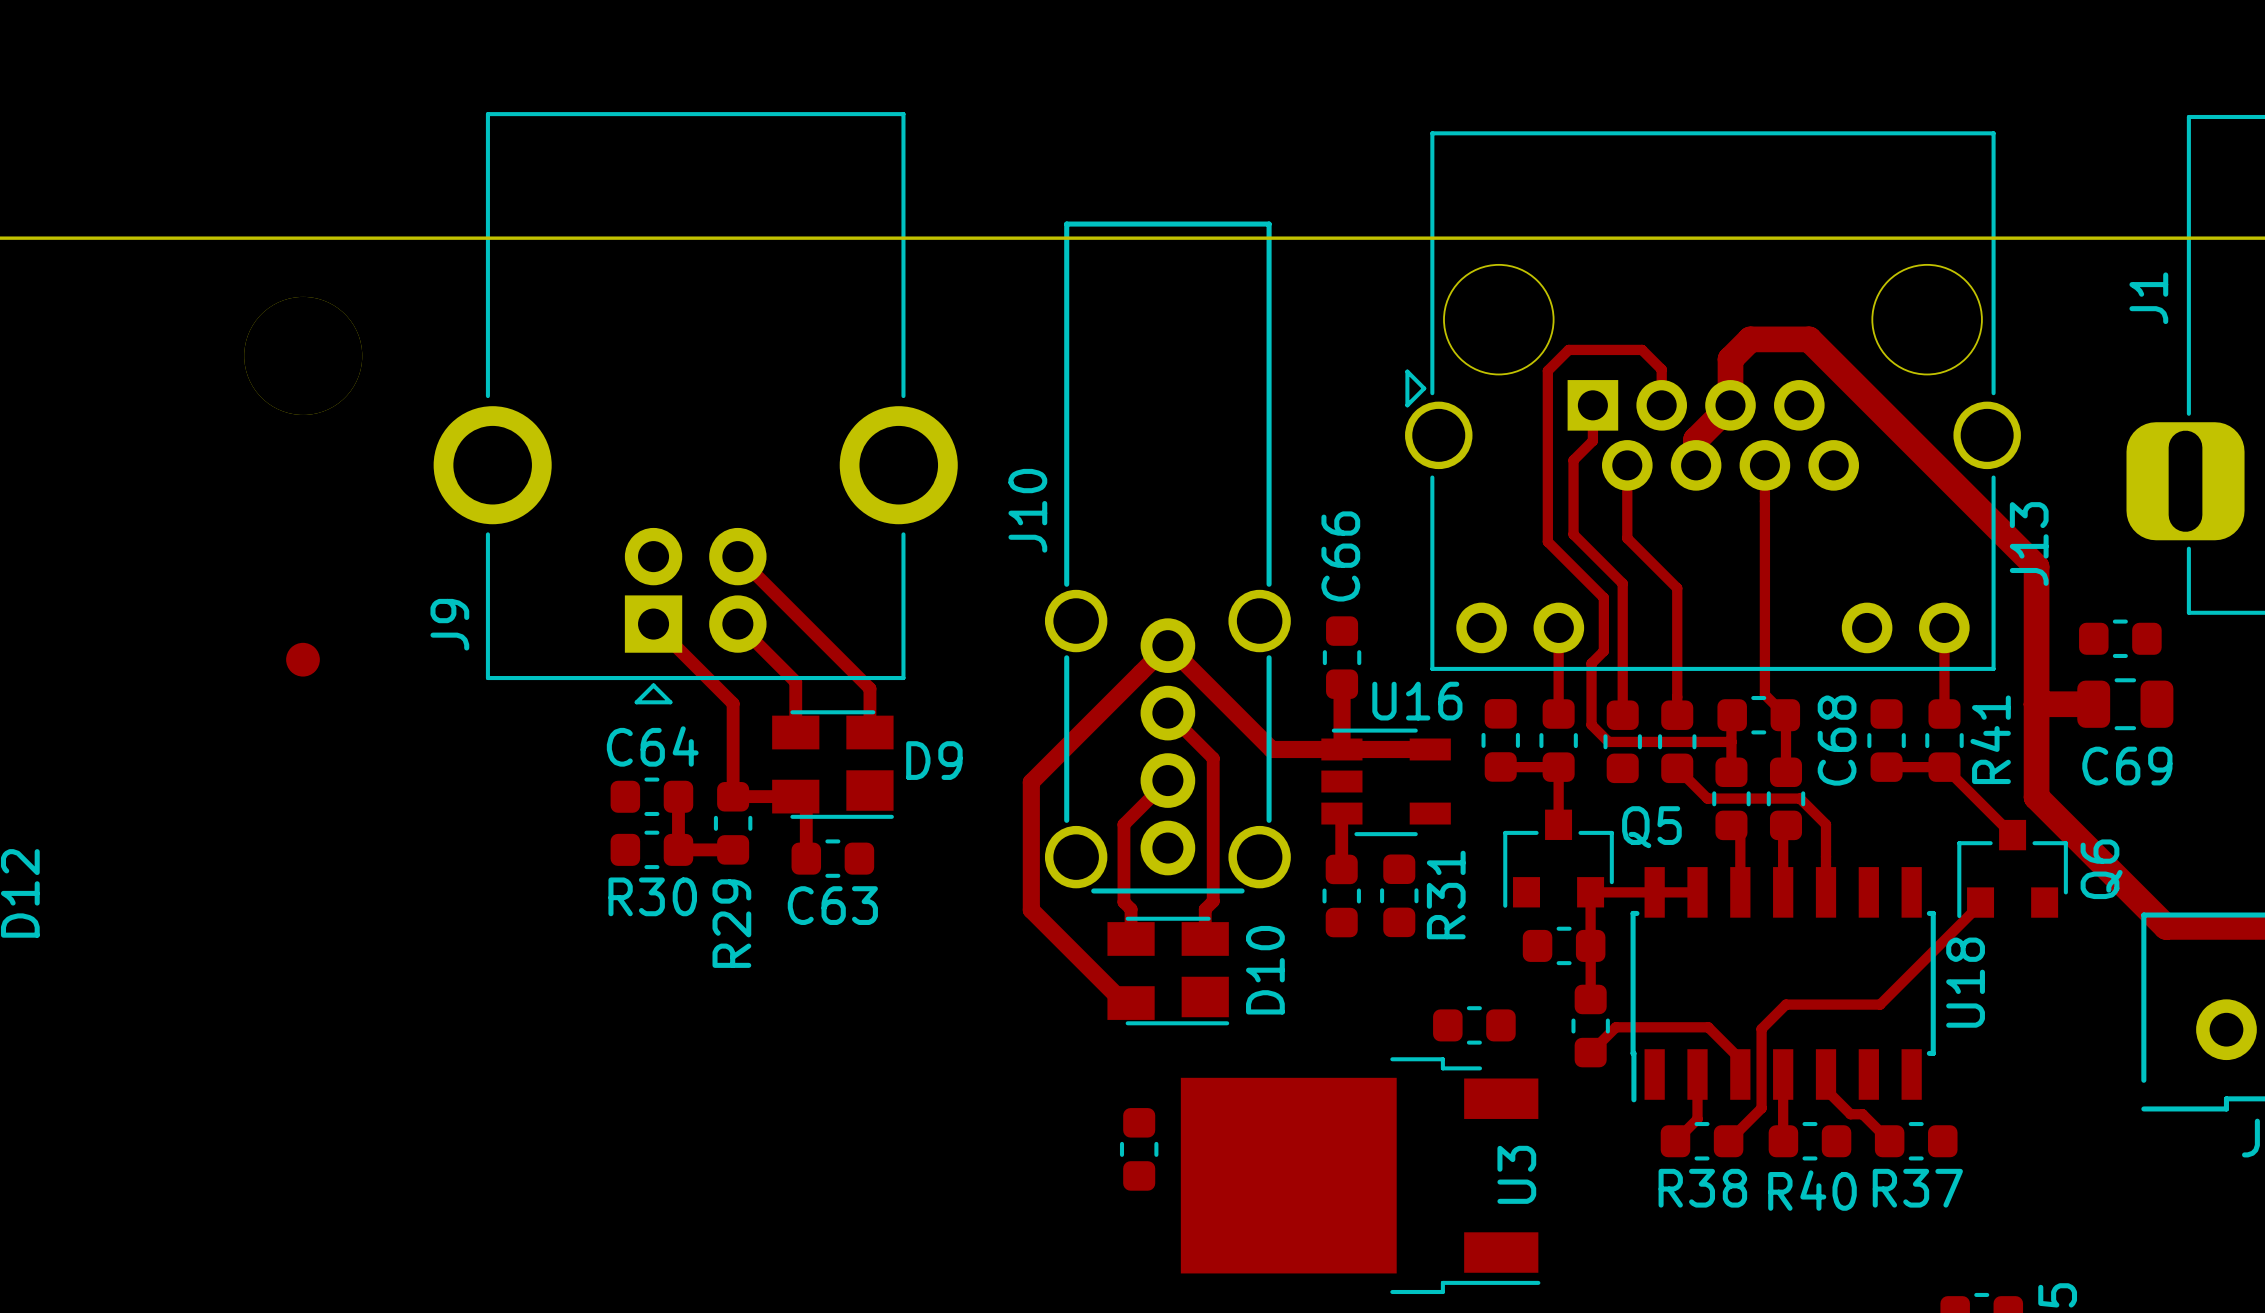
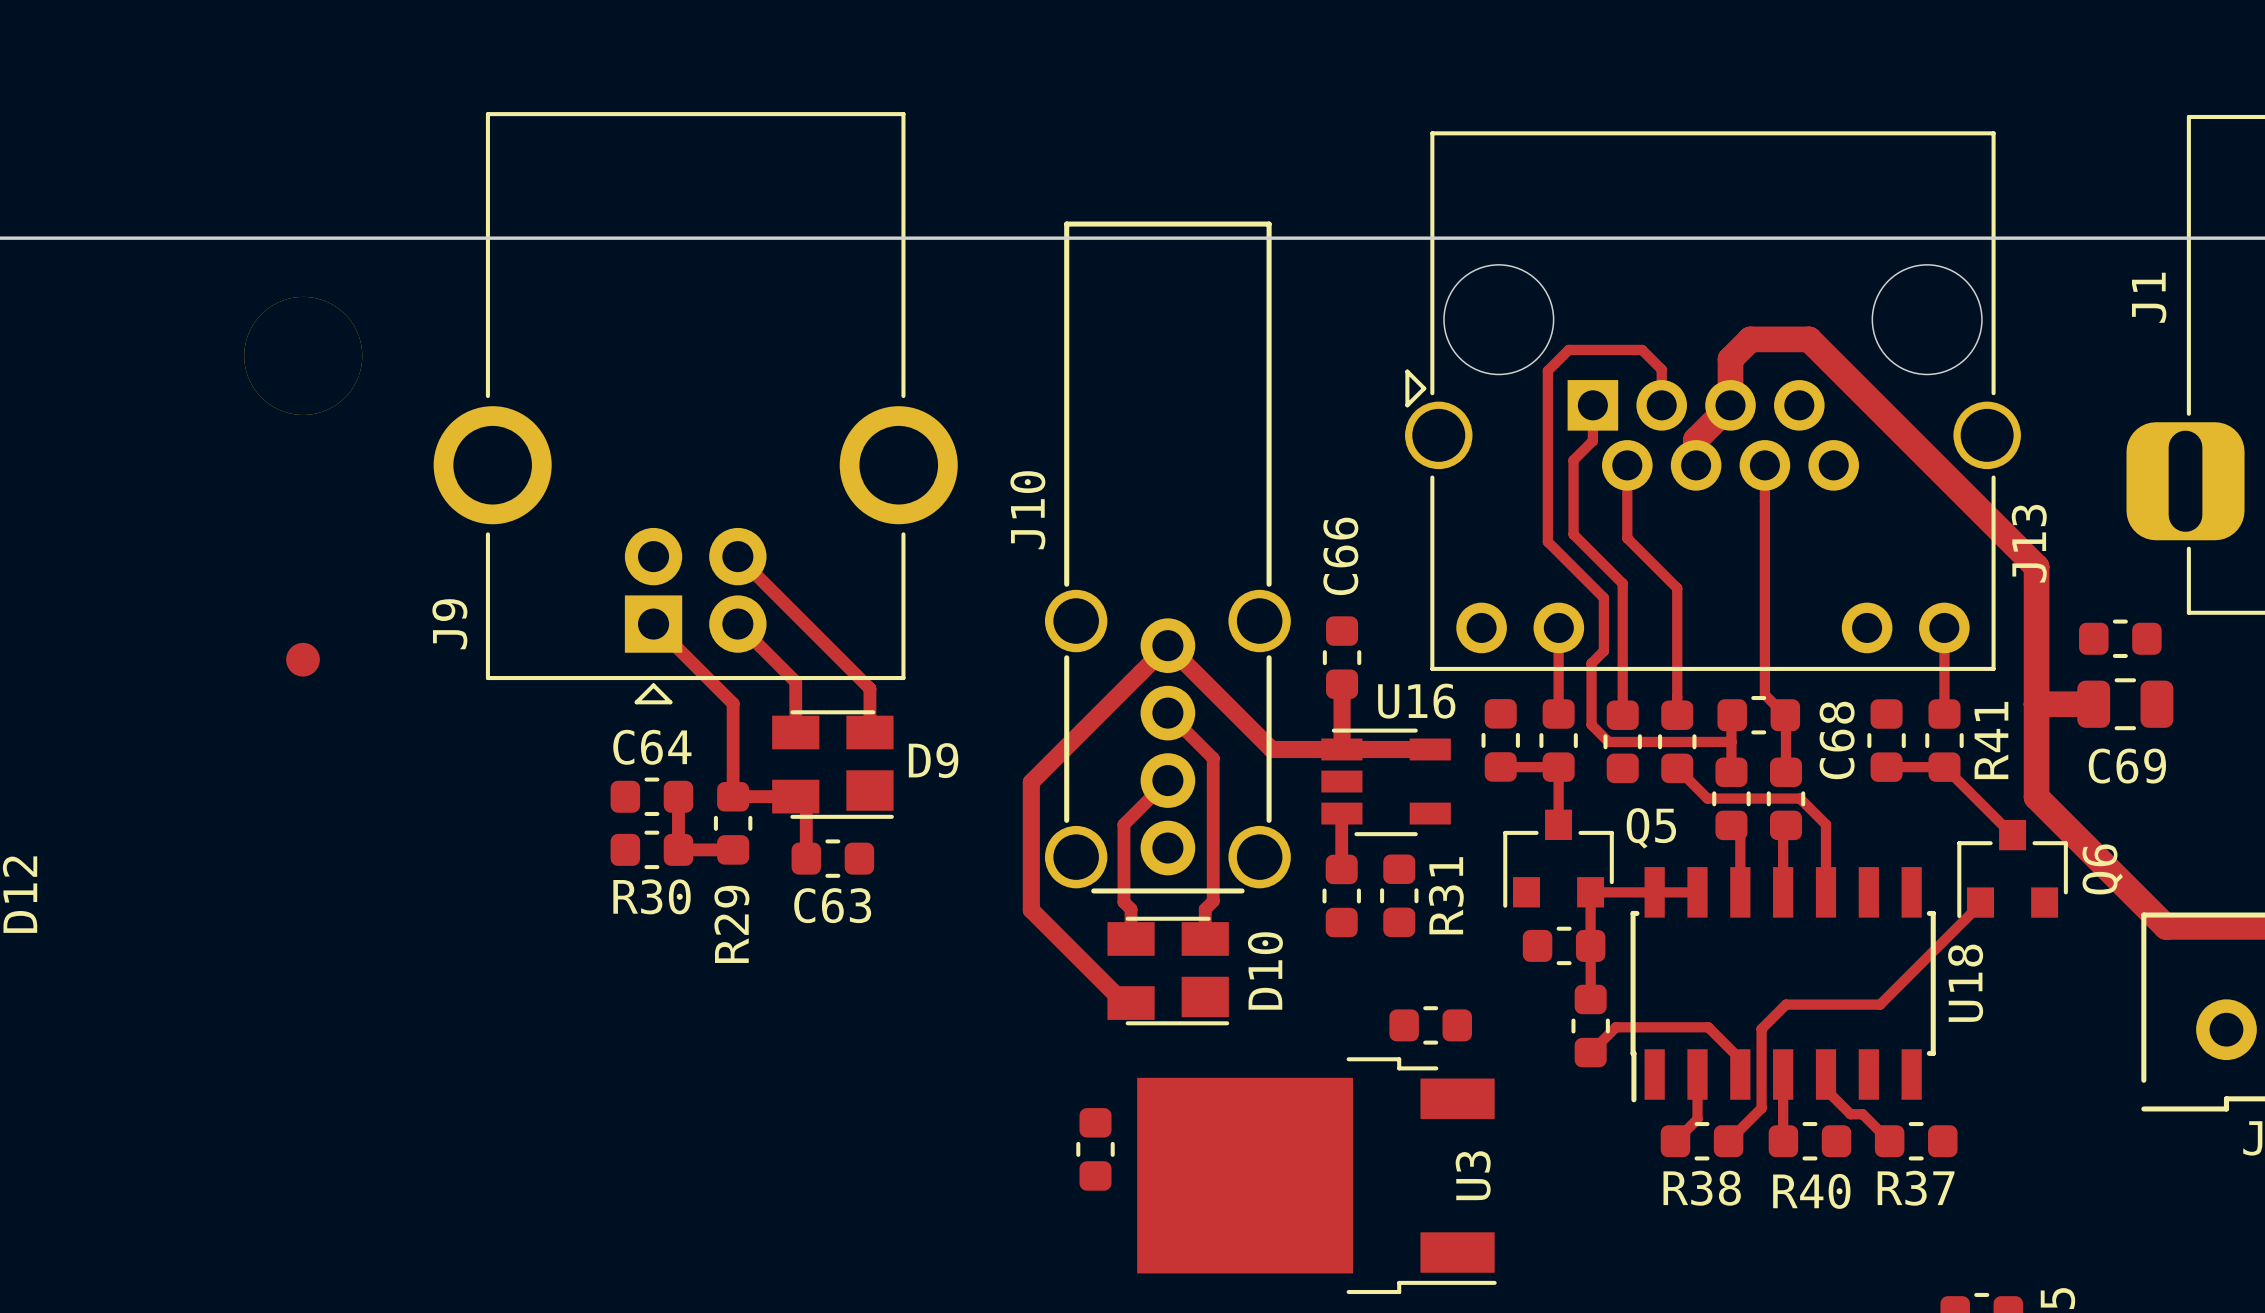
part position: (1474, 1025) -> (1430, 1025)
part position: (1139, 1149) -> (1095, 1149)
U3 position: (1360, 1175) -> (1316, 1175)

